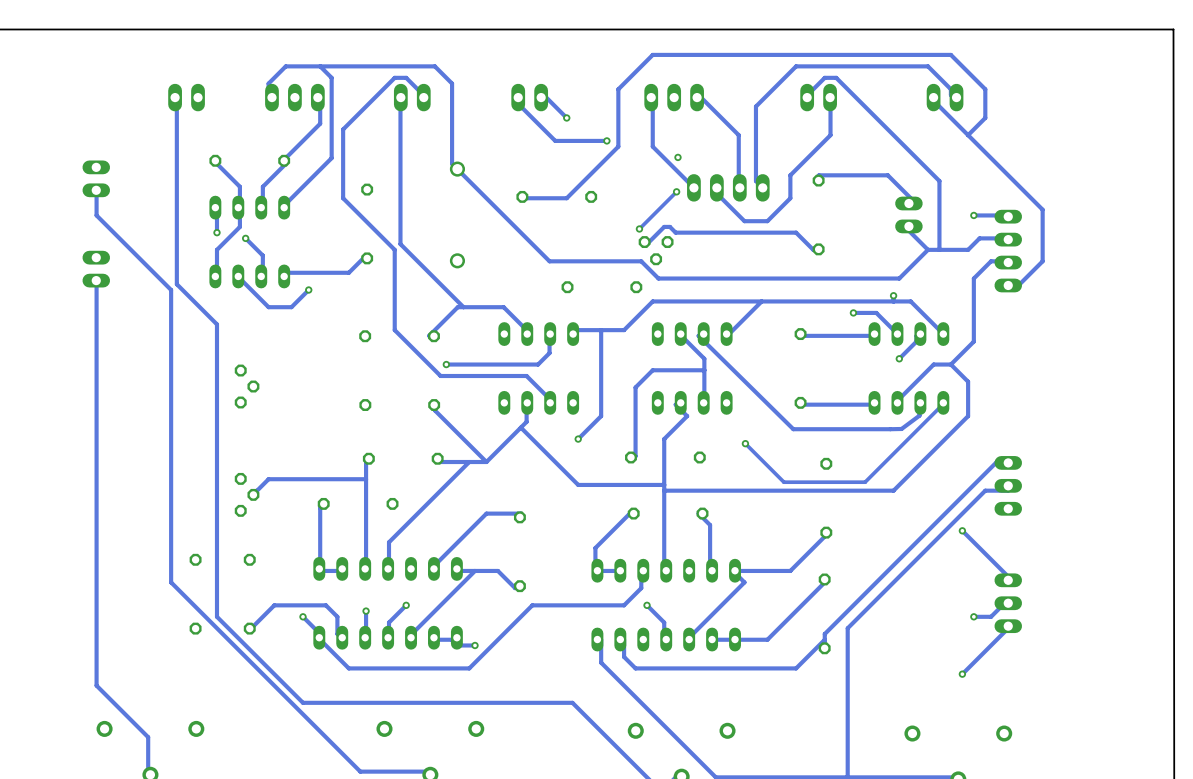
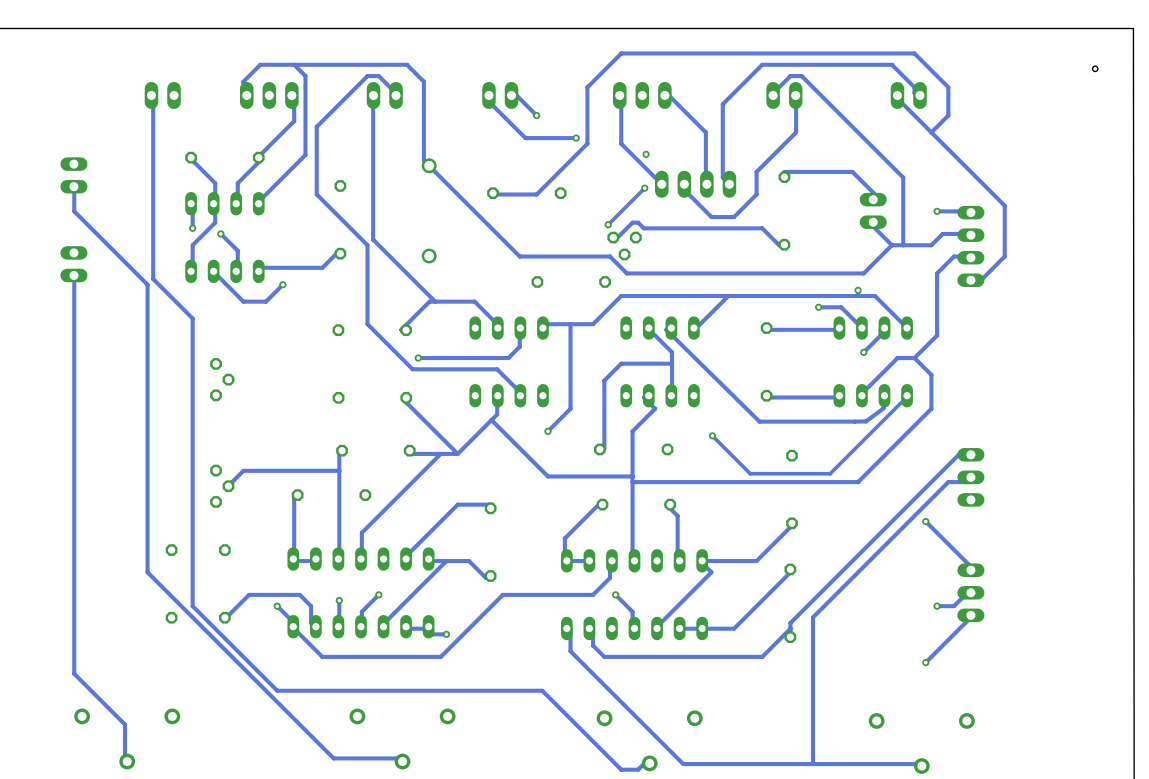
hole: none -> (1095, 68)

